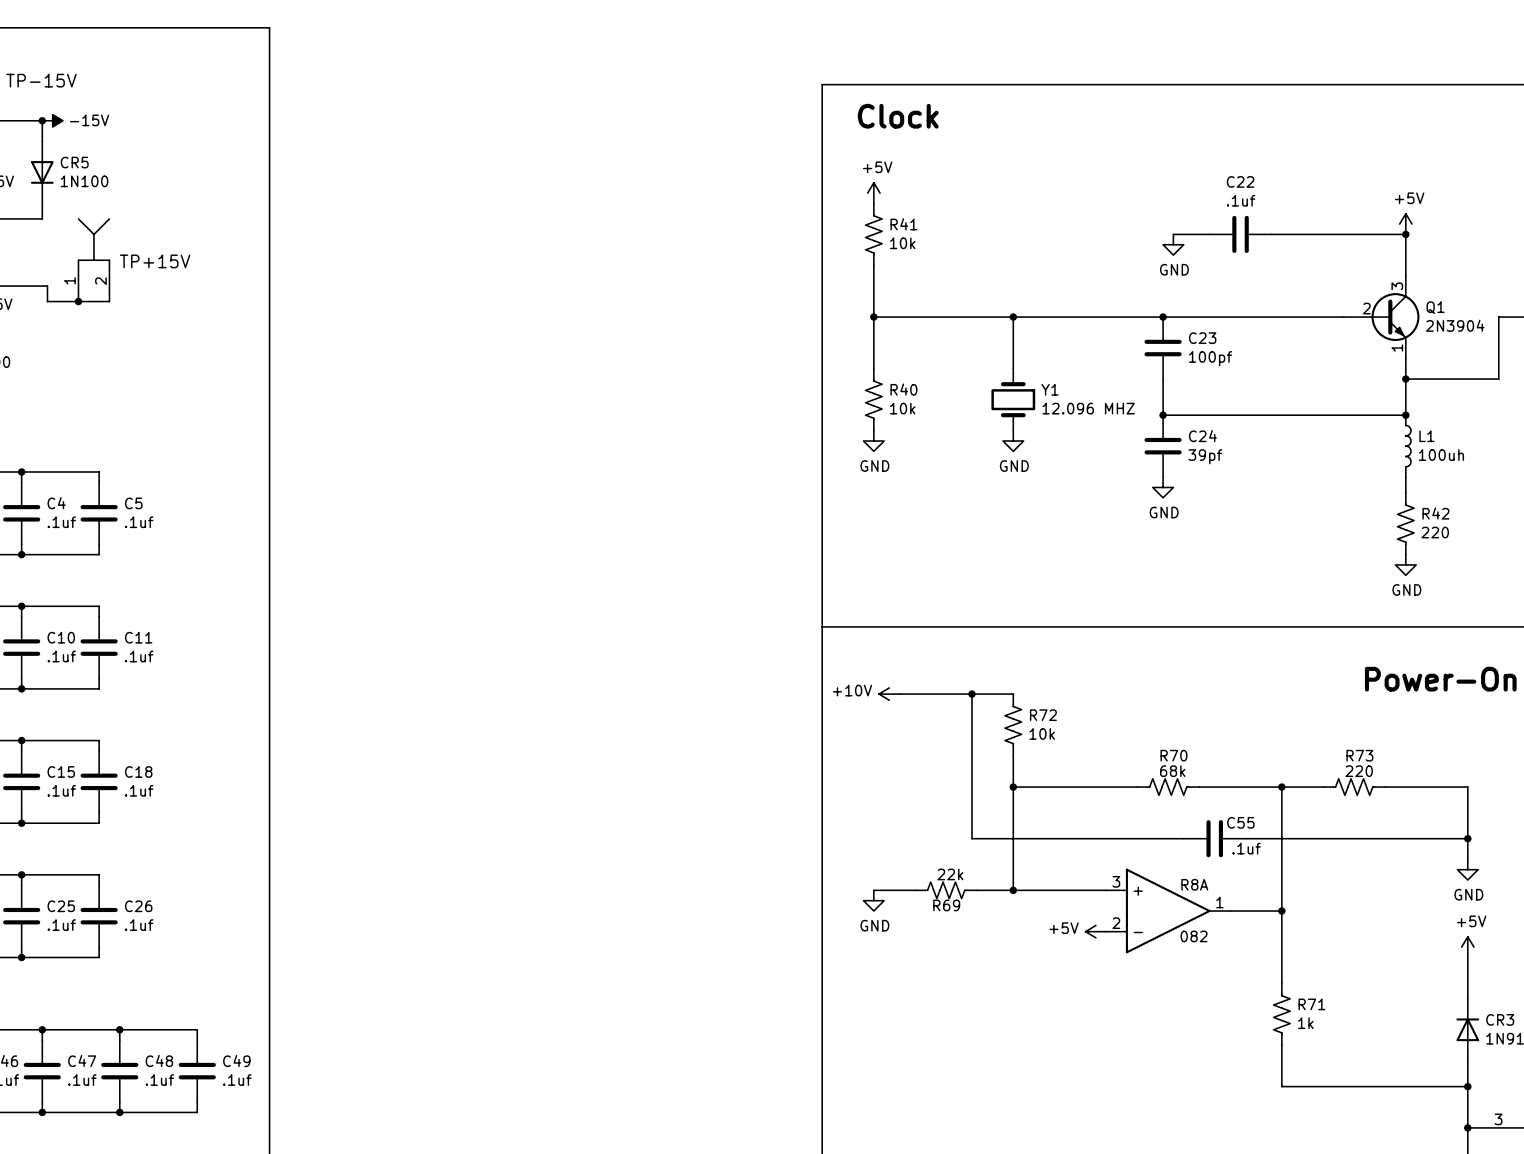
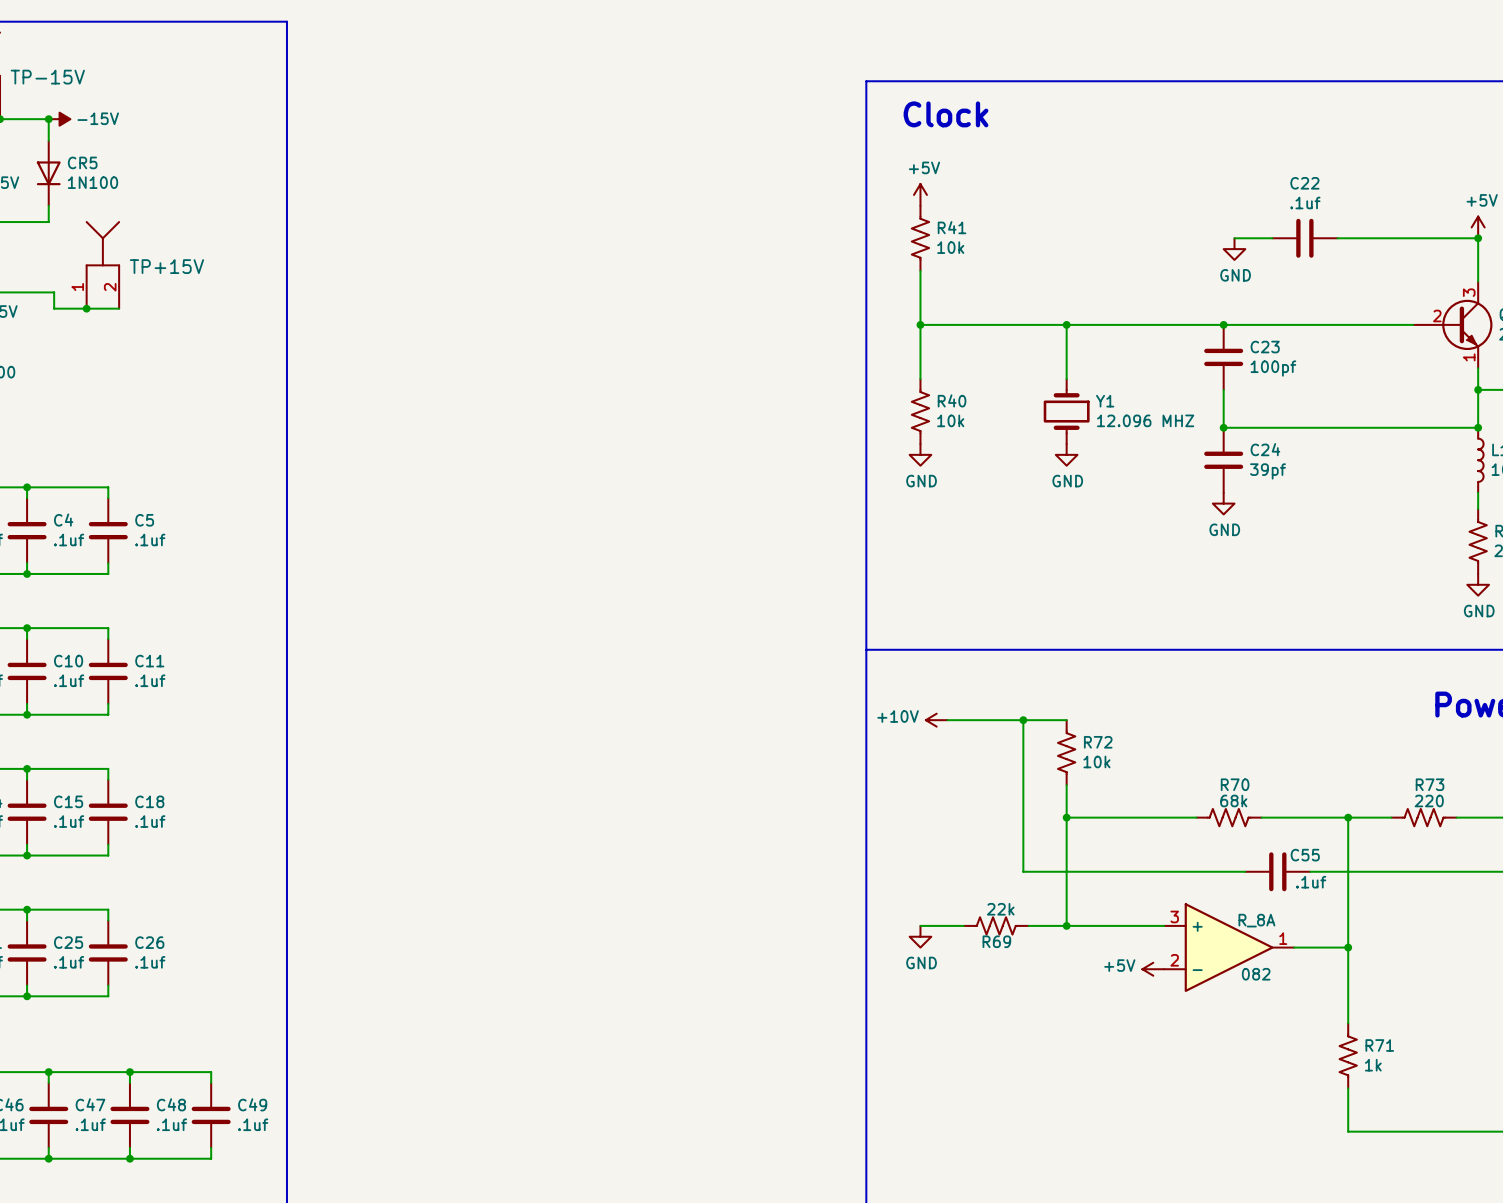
R8A name: R8A (1194, 884) -> R_8A (1256, 920)

